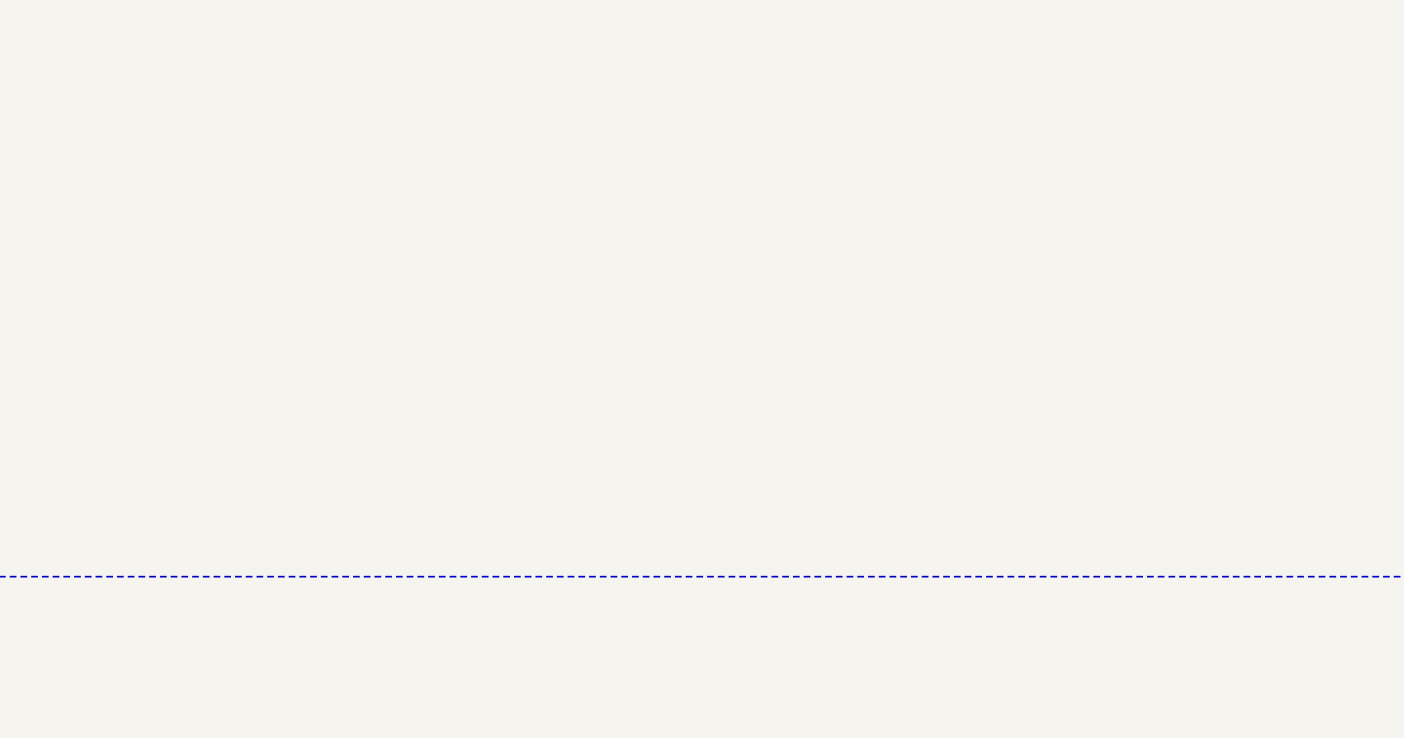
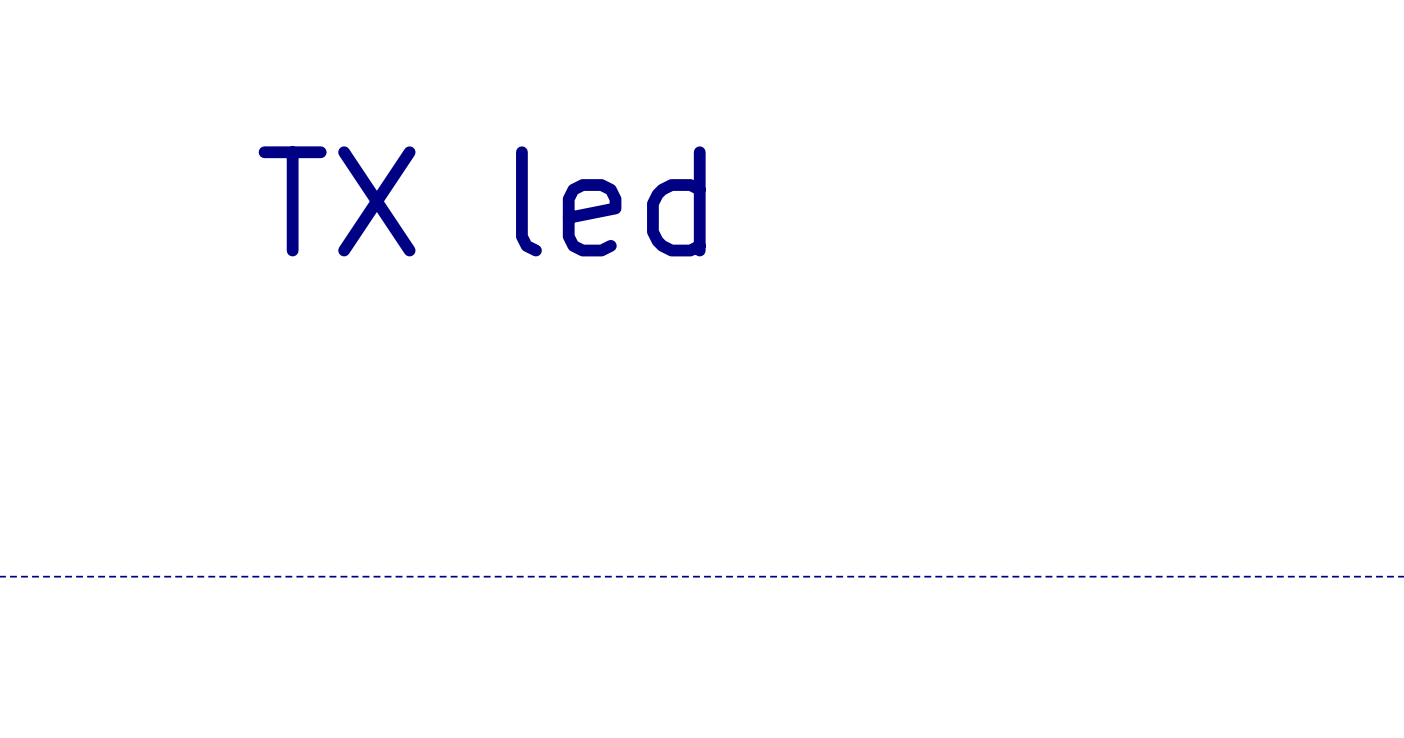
text: none -> TX led (482, 201)

